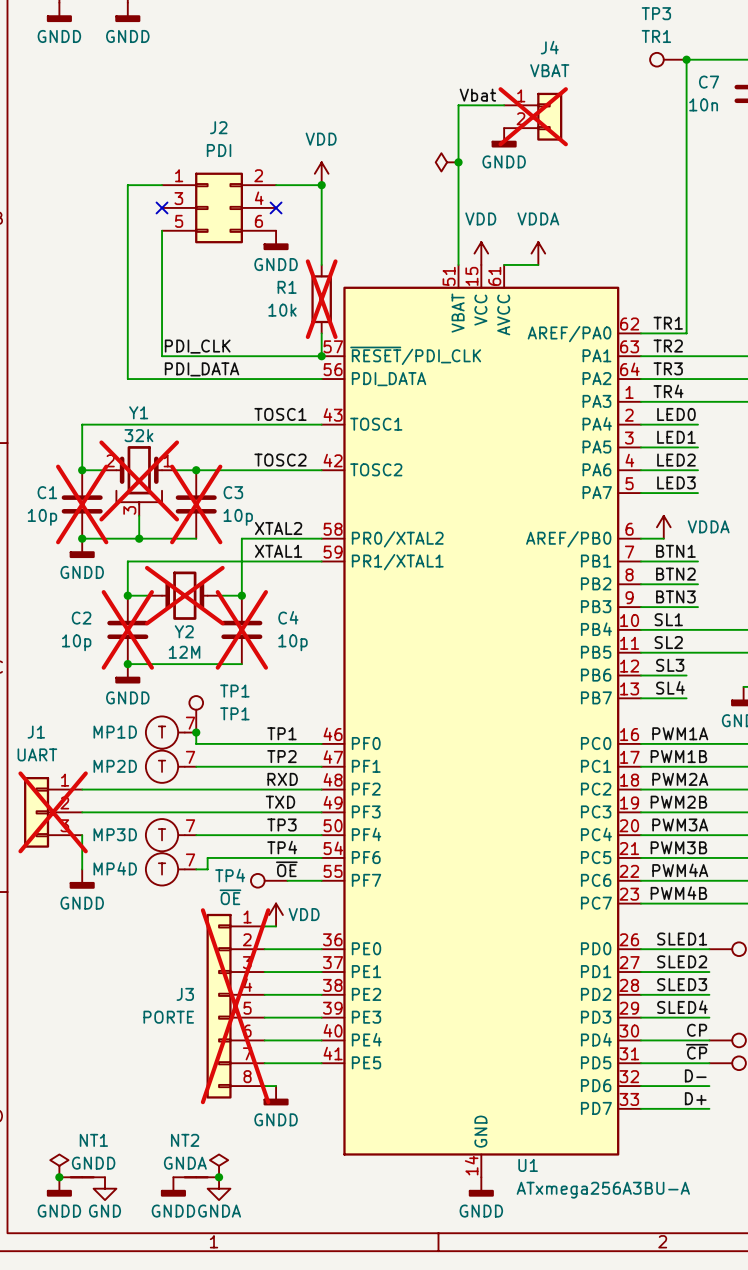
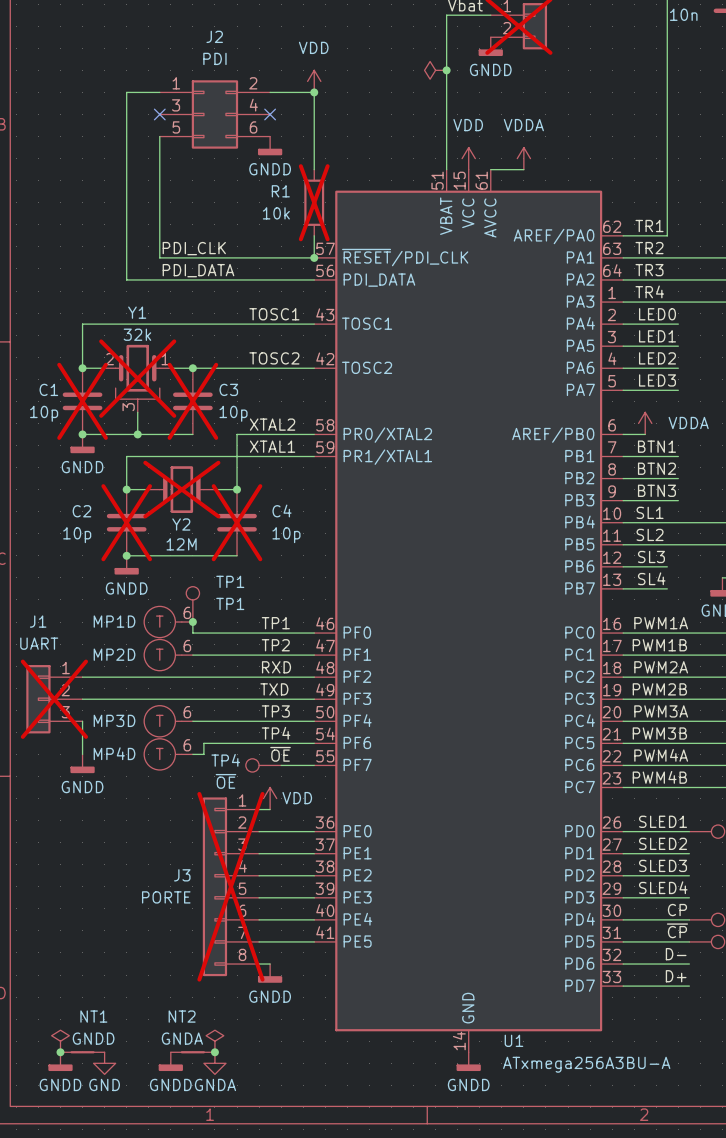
MP1D pin number: 7 (190, 723) -> 6 (187, 612)
MP2D pin number: 7 (190, 757) -> 6 (187, 646)
MP3D pin number: 7 (190, 825) -> 6 (187, 712)
MP4D pin number: 7 (190, 859) -> 6 (187, 745)

